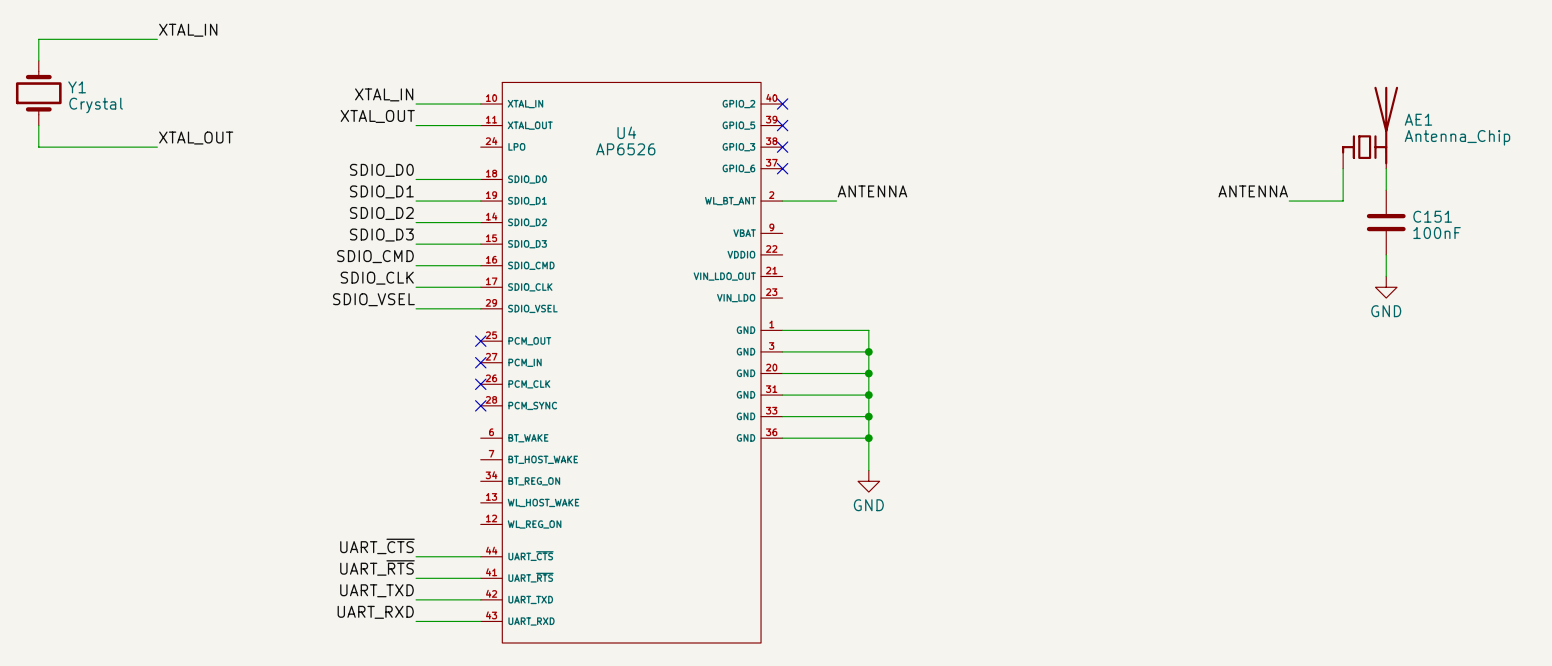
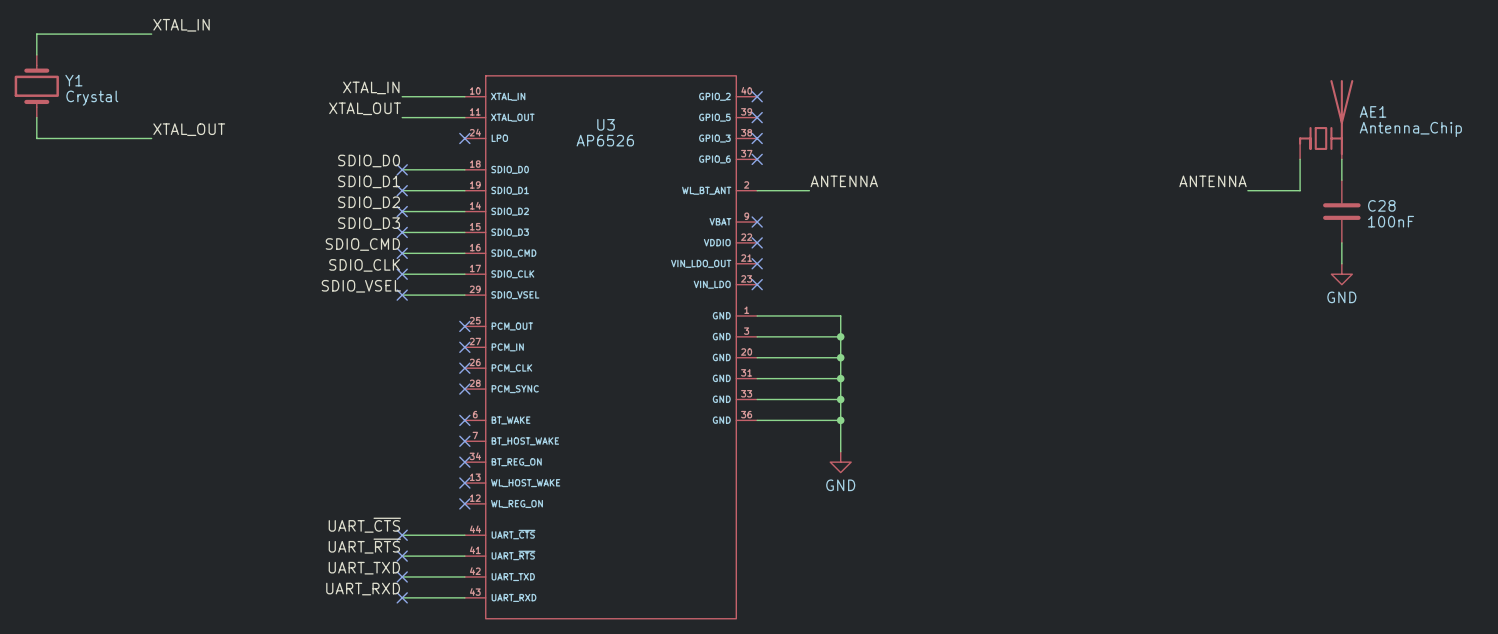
U4 name: U4 (626, 132) -> U3 (606, 124)
no-connect mark: none -> (464, 138)
no-connect mark: none -> (402, 169)
no-connect mark: none -> (402, 190)
C151 name: C151 (1432, 216) -> C28 (1381, 205)
no-connect mark: none -> (402, 211)
no-connect mark: none -> (757, 222)
no-connect mark: none -> (402, 232)
no-connect mark: none -> (757, 242)
no-connect mark: none -> (402, 253)
no-connect mark: none -> (757, 263)
no-connect mark: none -> (402, 274)
no-connect mark: none -> (757, 284)
no-connect mark: none -> (402, 295)
no-connect mark: none -> (464, 420)
no-connect mark: none -> (464, 441)
no-connect mark: none -> (464, 462)
no-connect mark: none -> (464, 483)
no-connect mark: none -> (464, 503)
no-connect mark: none -> (402, 535)
no-connect mark: none -> (402, 556)
no-connect mark: none -> (402, 576)
no-connect mark: none -> (402, 597)

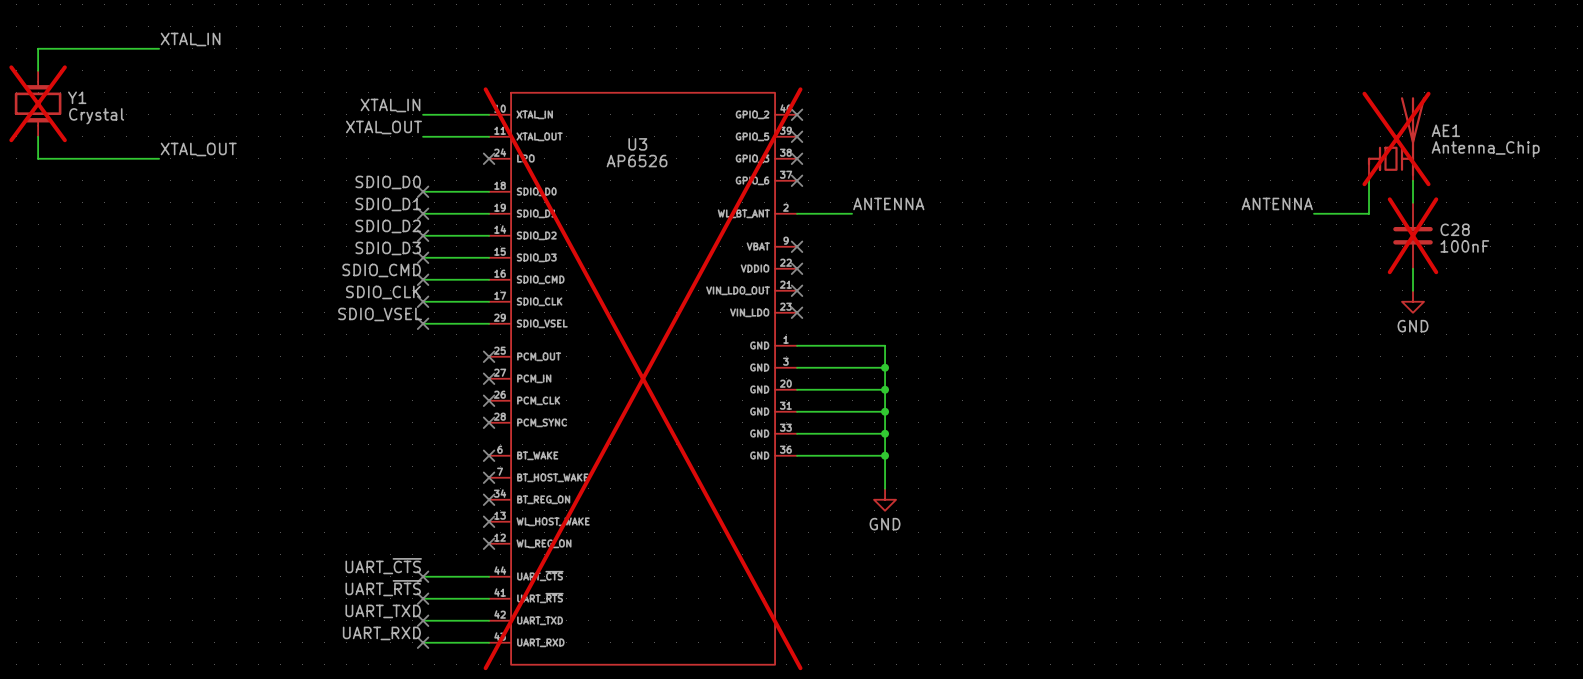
Y1 do-not-place cross: none -> (38, 103)
AE1 do-not-place cross: none -> (1396, 138)
C28 do-not-place cross: none -> (1413, 235)
U3 do-not-place cross: none -> (643, 378)

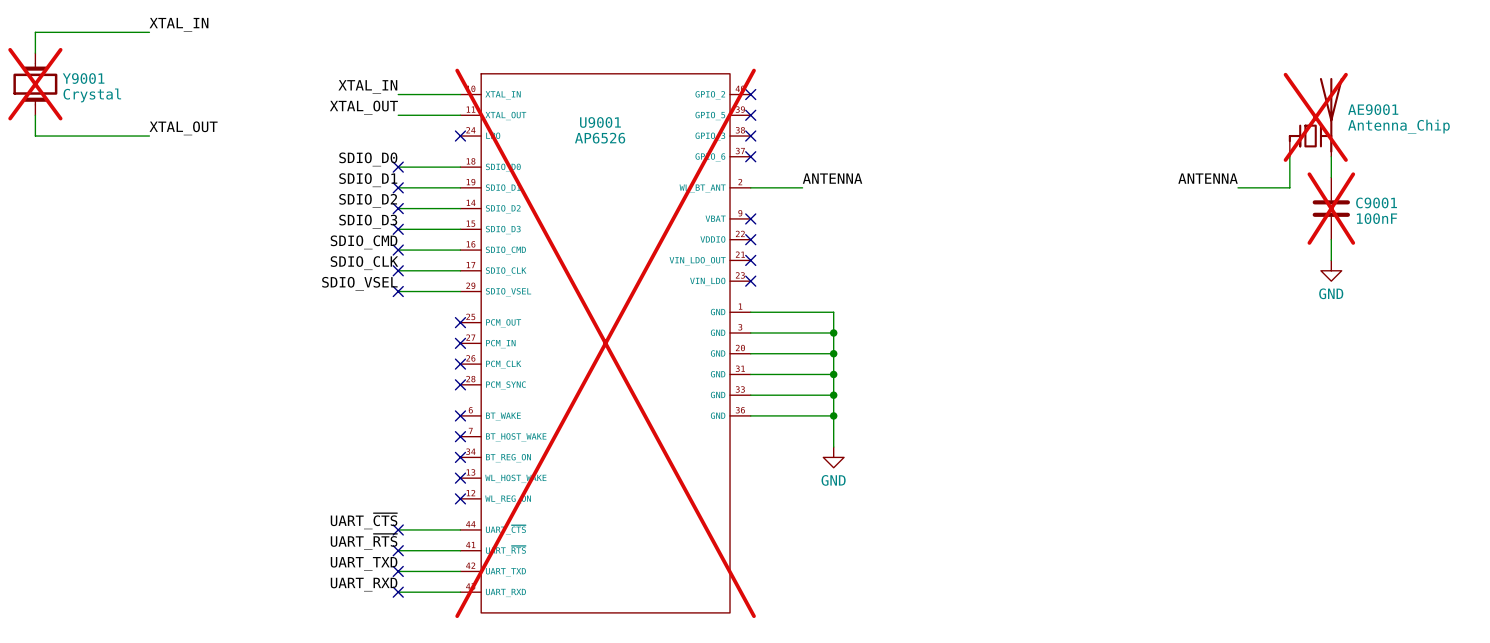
Y1 name: Y1 (77, 97) -> Y9001 (83, 78)
AE1 name: AE1 (1445, 130) -> AE9001 (1373, 109)
U3 name: U3 (637, 144) -> U9001 (600, 122)
C28 name: C28 (1455, 229) -> C9001 (1376, 202)

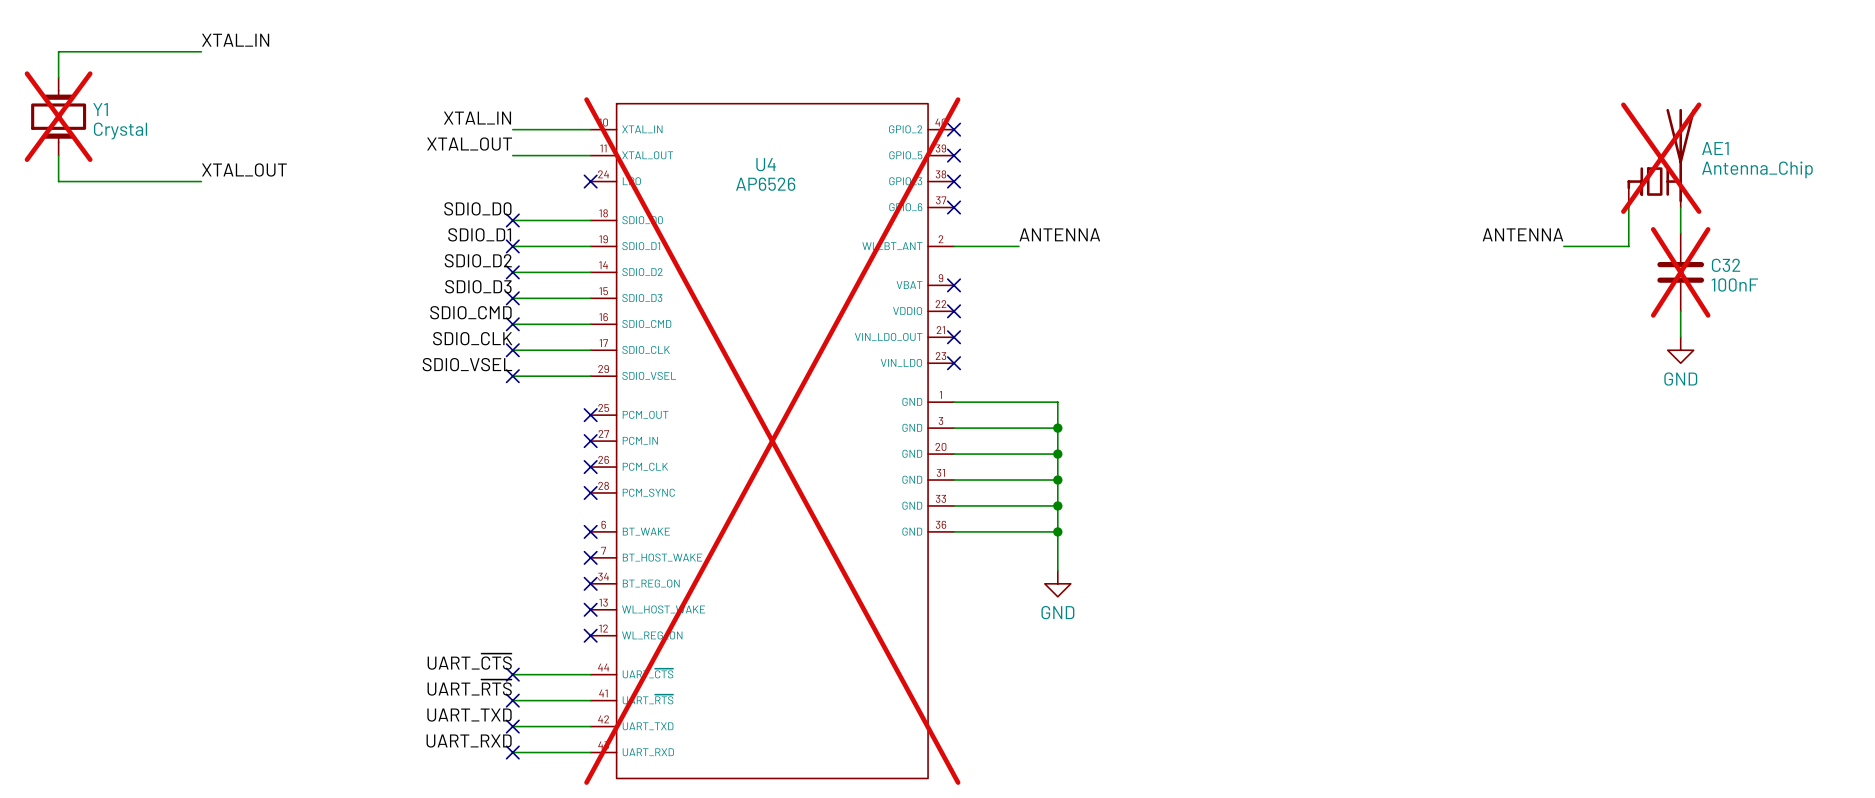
Y9001 name: Y9001 (83, 78) -> Y1 (100, 109)
AE9001 name: AE9001 (1373, 109) -> AE1 (1715, 148)
U9001 name: U9001 (600, 122) -> U4 (766, 164)
C9001 name: C9001 (1376, 202) -> C32 (1726, 265)

